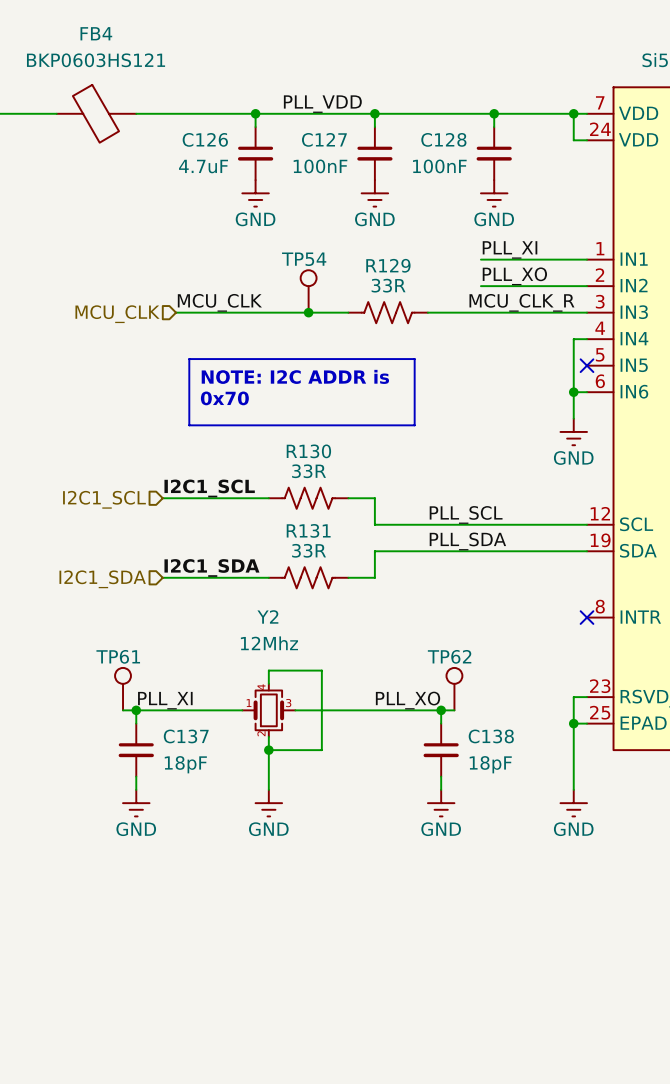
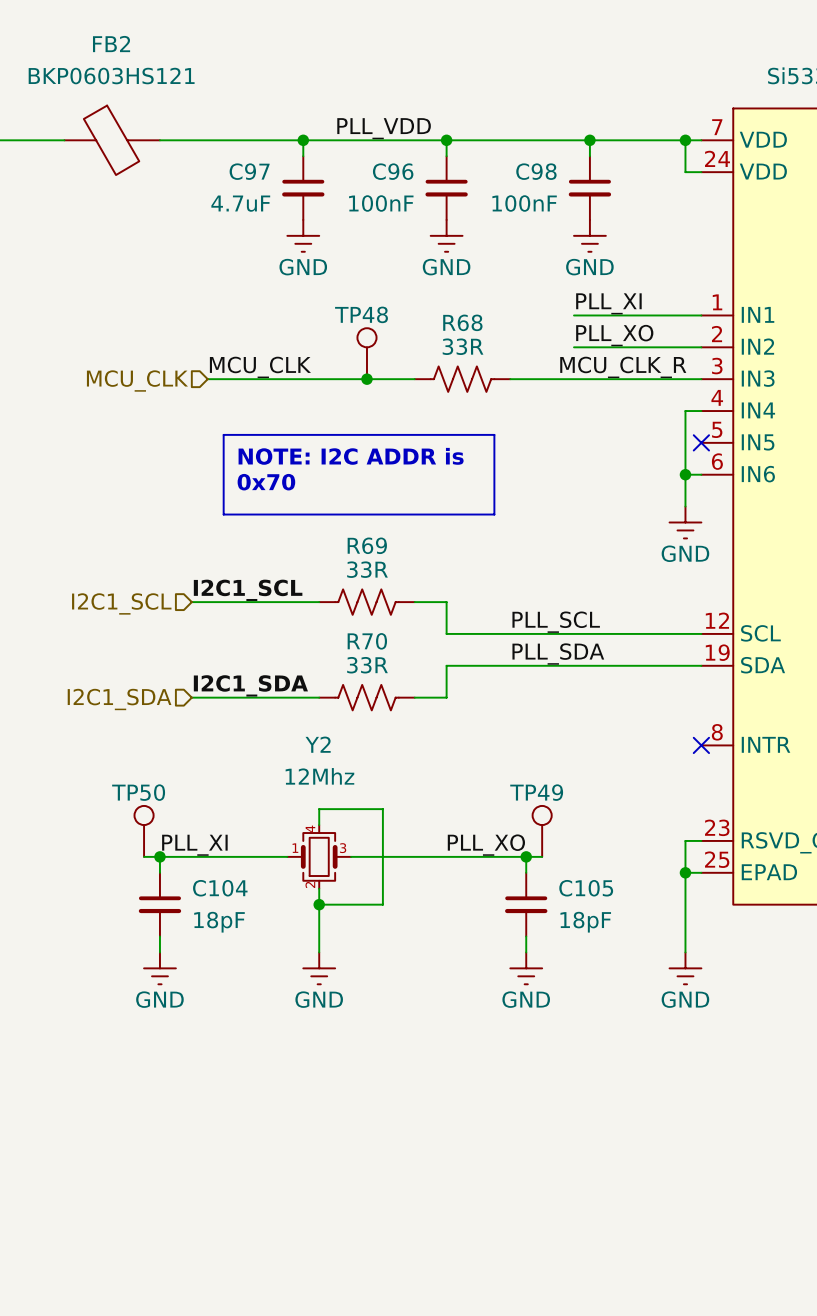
FB4 name: FB4 (96, 33) -> FB2 (111, 44)
C126 name: C126 (205, 139) -> C97 (249, 171)
C127 name: C127 (324, 139) -> C96 (393, 171)
C128 name: C128 (443, 139) -> C98 (536, 171)
TP54 name: TP54 (304, 259) -> TP48 (361, 314)
R129 name: R129 (388, 265) -> R68 (462, 322)
R130 name: R130 (308, 451) -> R69 (367, 545)
R131 name: R131 (308, 530) -> R70 (367, 641)
TP61 name: TP61 (118, 656) -> TP50 (138, 792)
TP62 name: TP62 (449, 656) -> TP49 (536, 792)
C137 name: C137 (186, 736) -> C104 (220, 888)
C138 name: C138 (491, 736) -> C105 (586, 888)

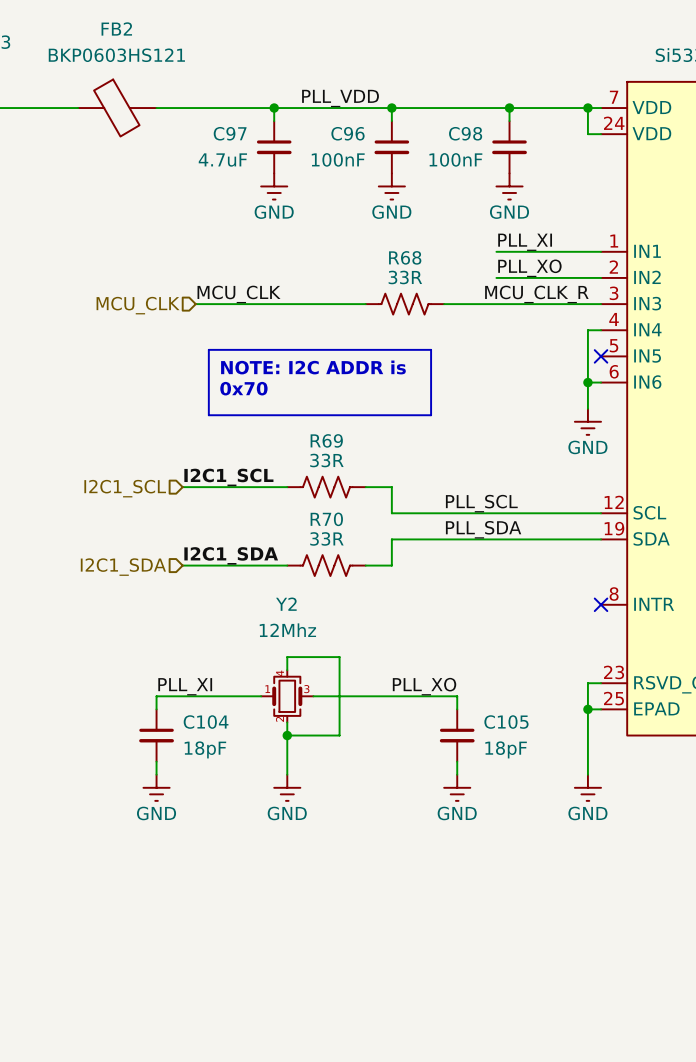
TP48: (366, 353) -> none
junction: (366, 379) -> none
TP50: (144, 831) -> none
TP49: (542, 831) -> none
wire: (144, 856) (159, 856) -> none
junction: (159, 856) -> none
wire: (526, 856) (542, 856) -> none
junction: (526, 856) -> none

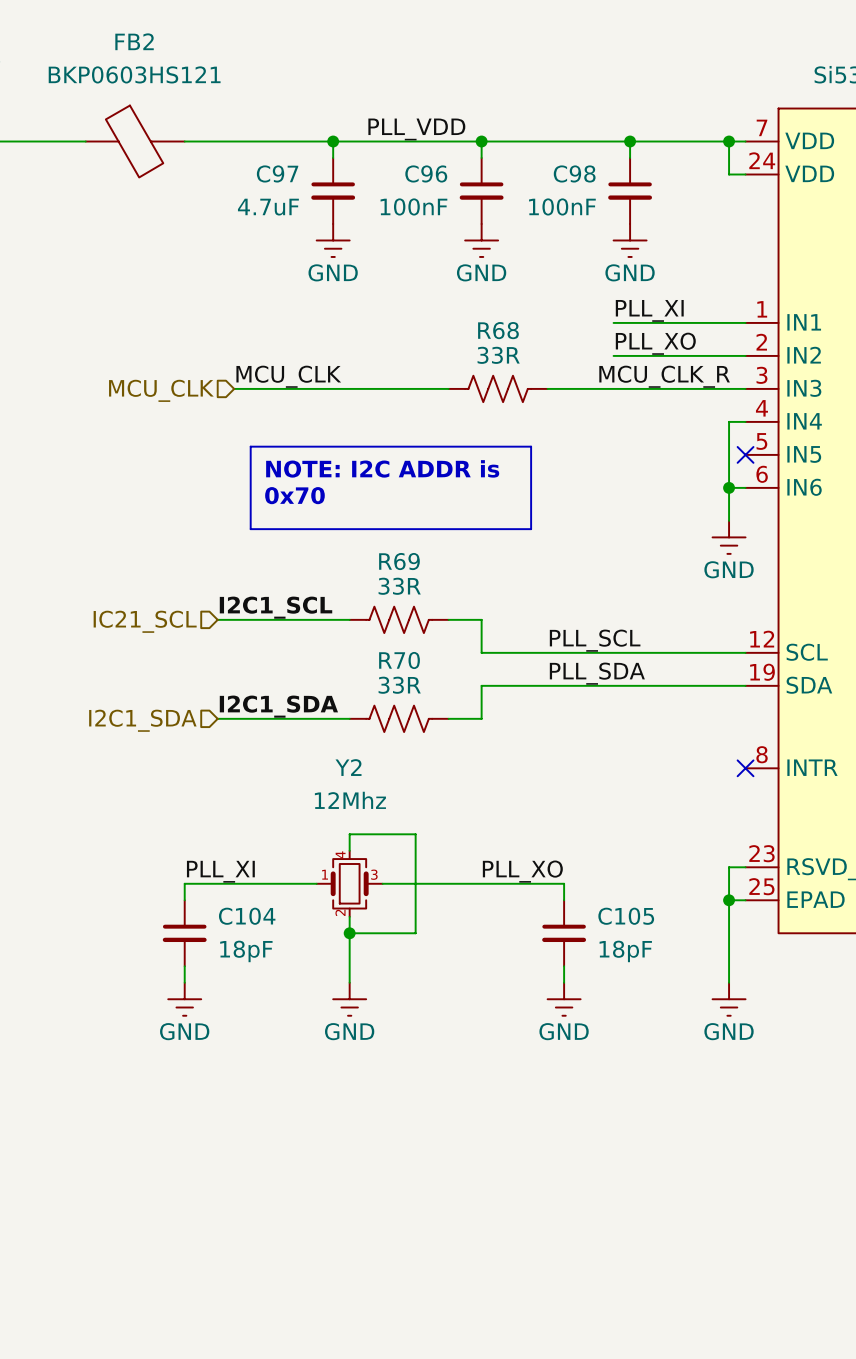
hierarchical label: I2C1_SCL (125, 488) -> IC21_SCL (145, 621)

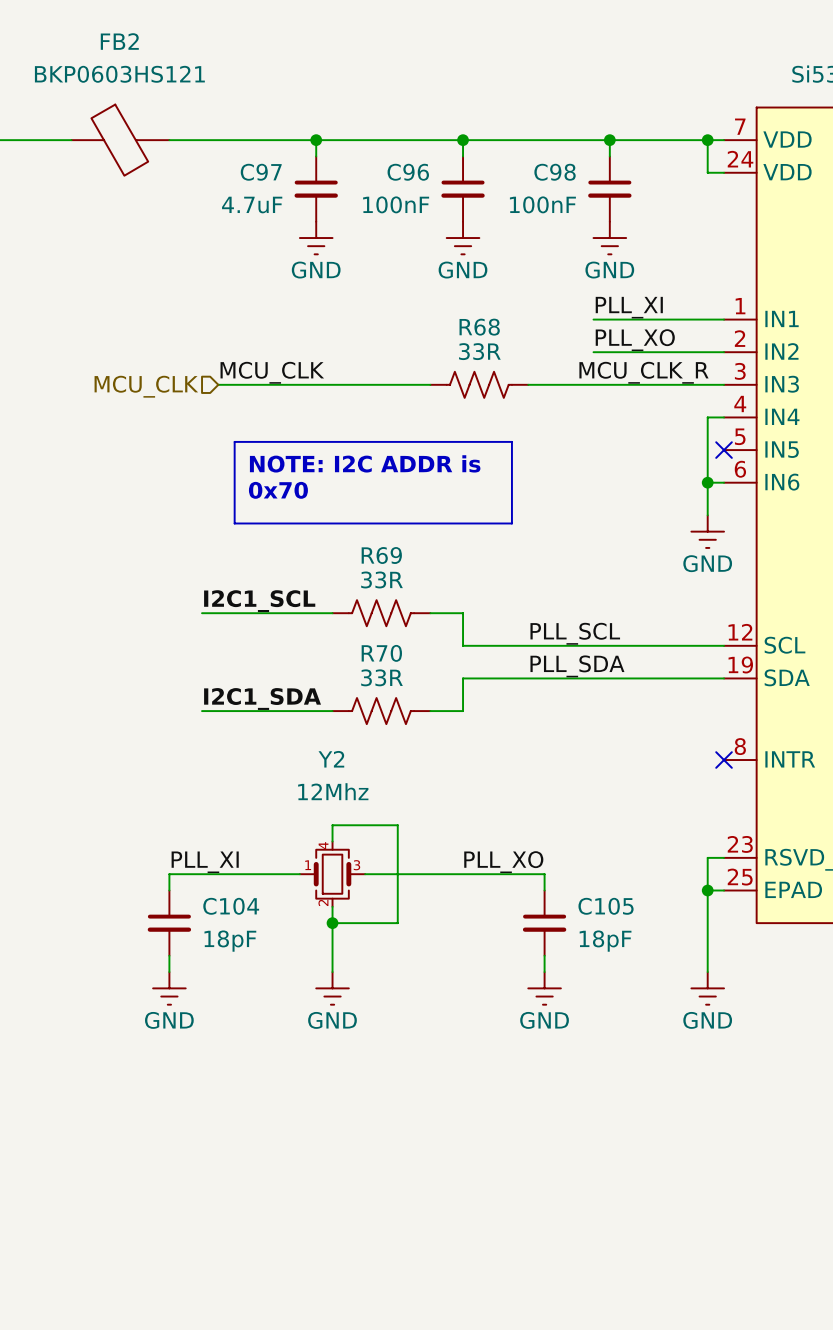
label: PLL_VDD (416, 129) -> none
hierarchical label: IC21_SCL (145, 621) -> none
hierarchical label: I2C1_SDA (142, 720) -> none

